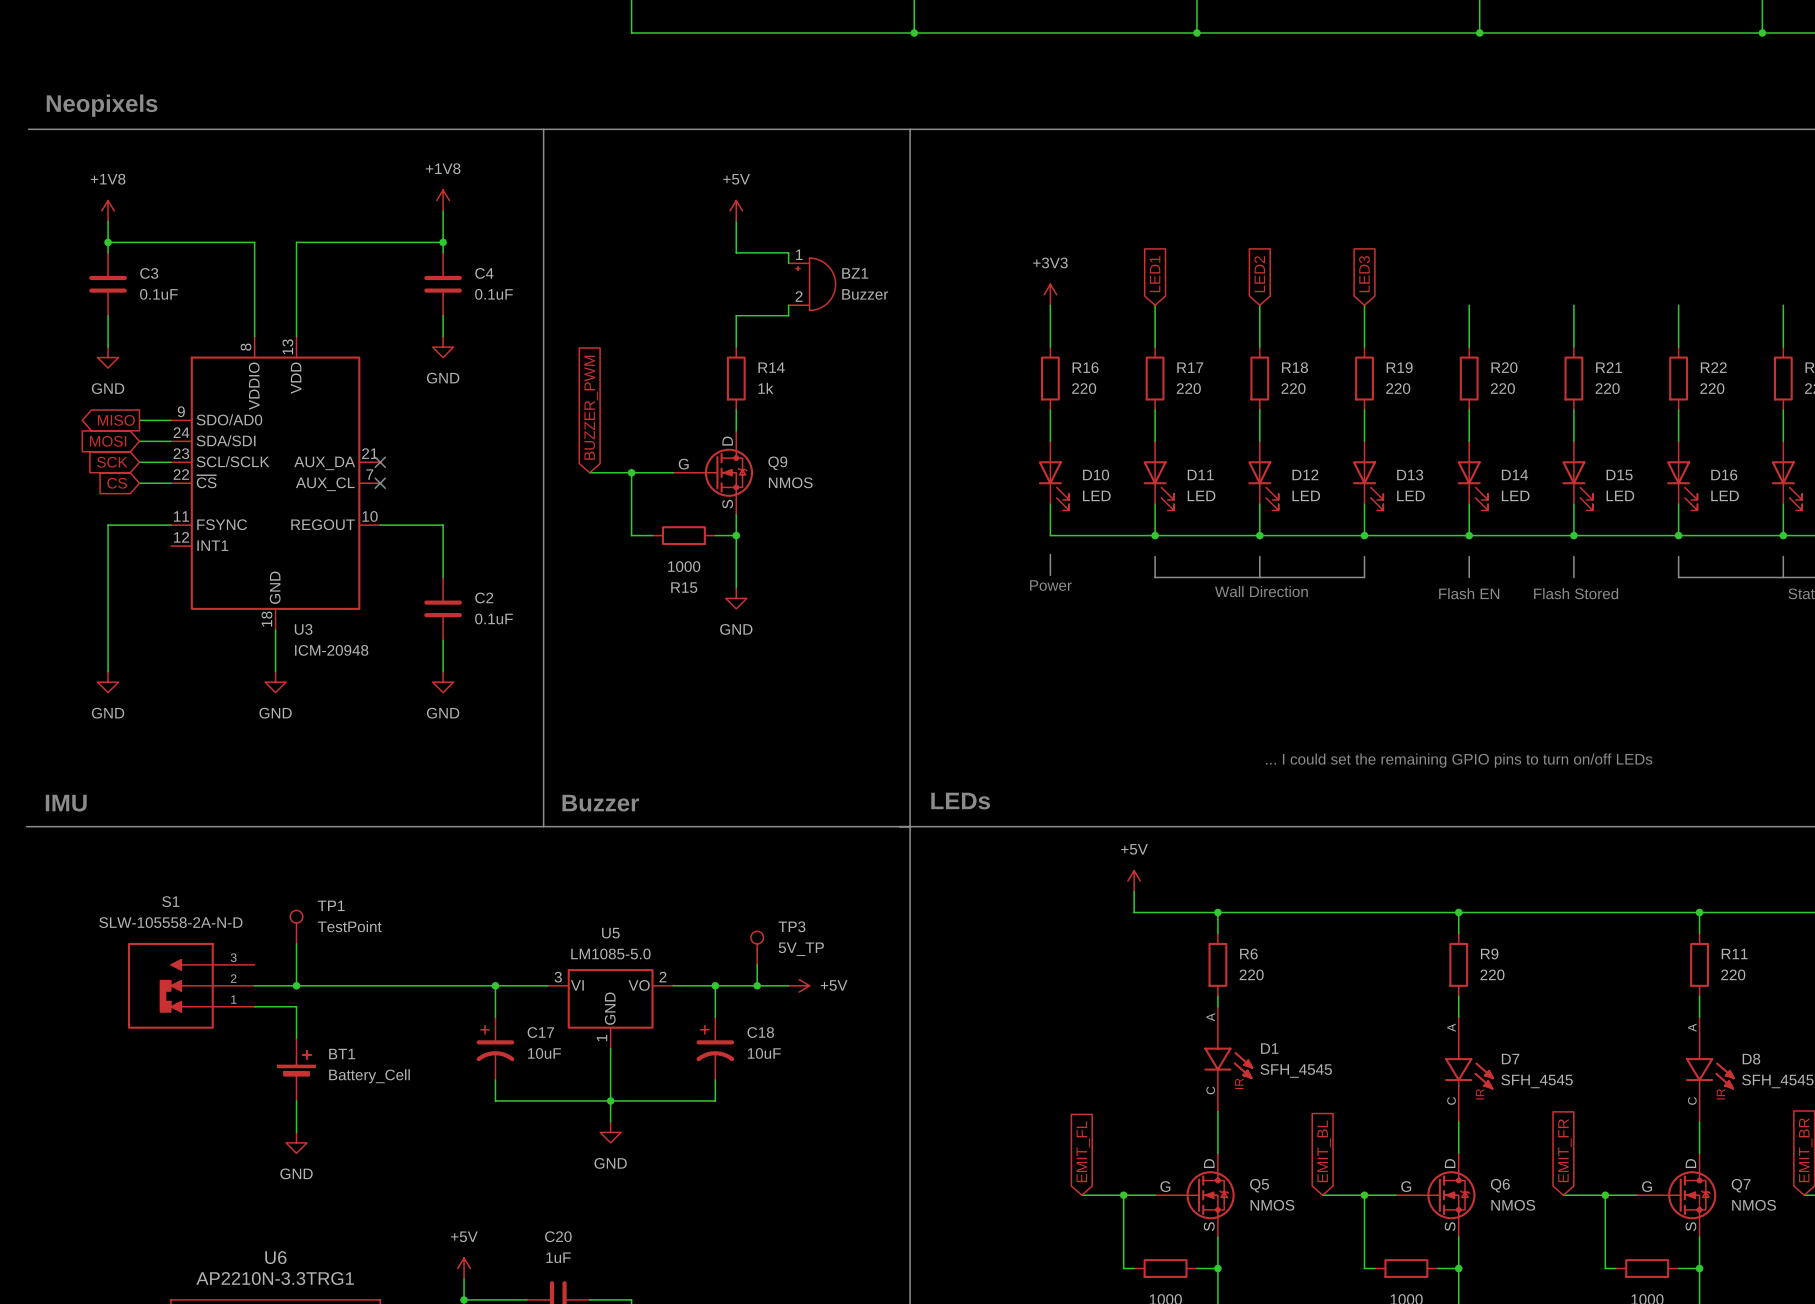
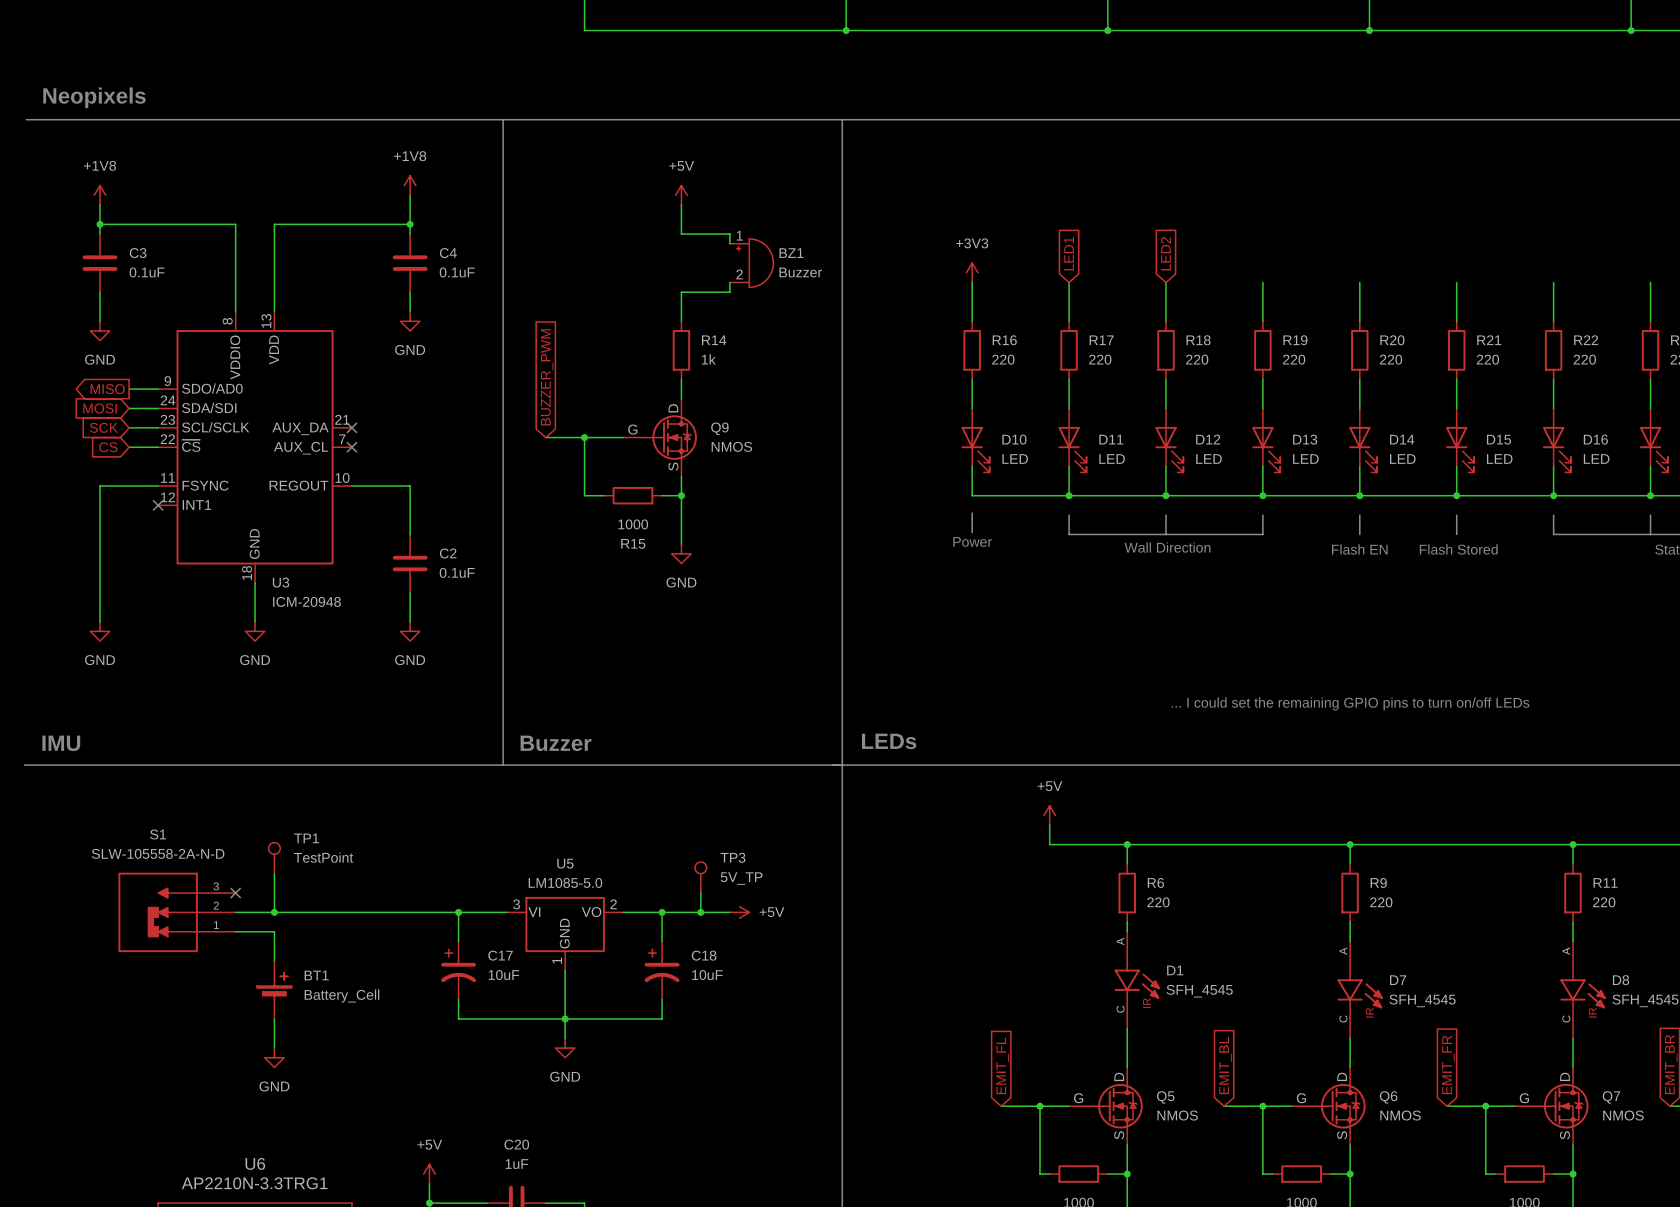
global label: LED3 (1364, 274) -> none
no-connect mark: none -> (158, 505)
no-connect mark: none -> (235, 893)

